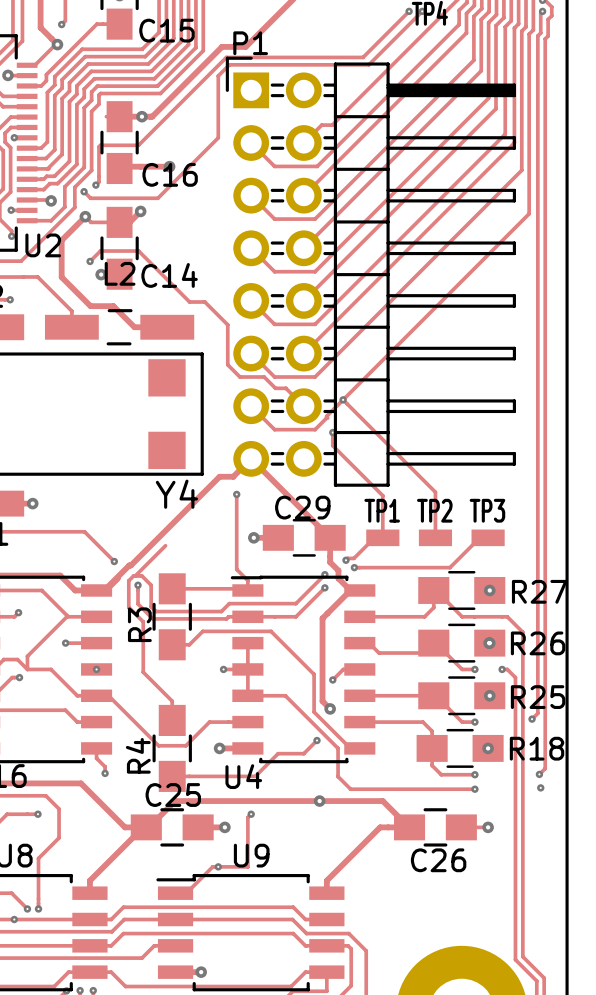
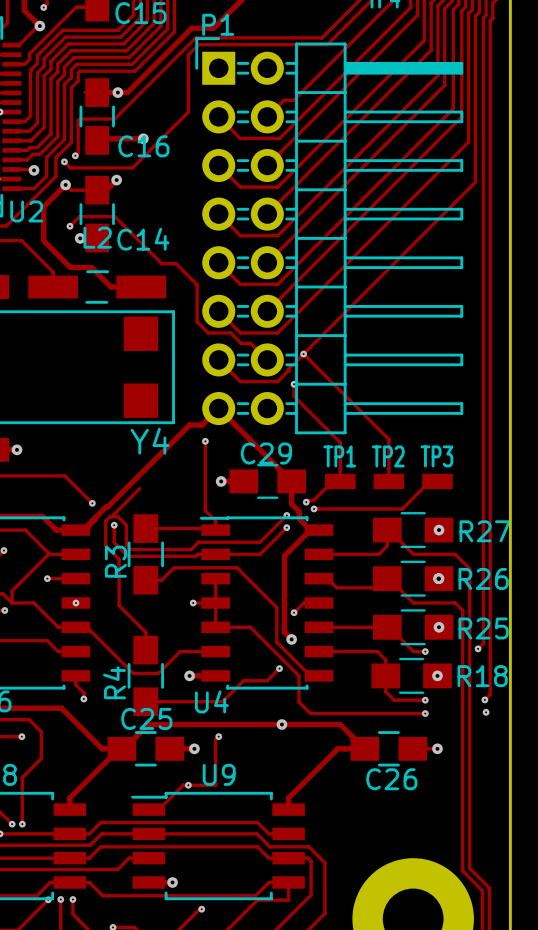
track: none -> (425, 602) (450, 602)
via: (474, 669) -> none
via: (502, 669) -> none

